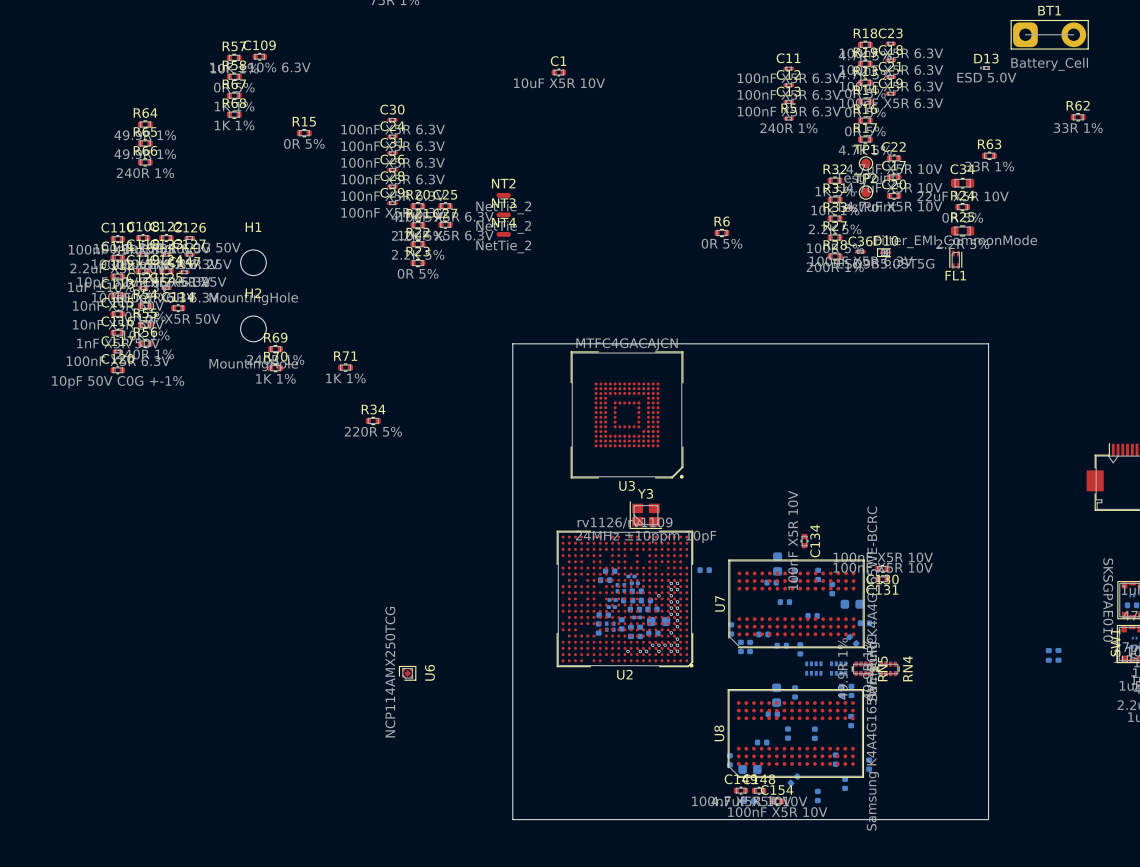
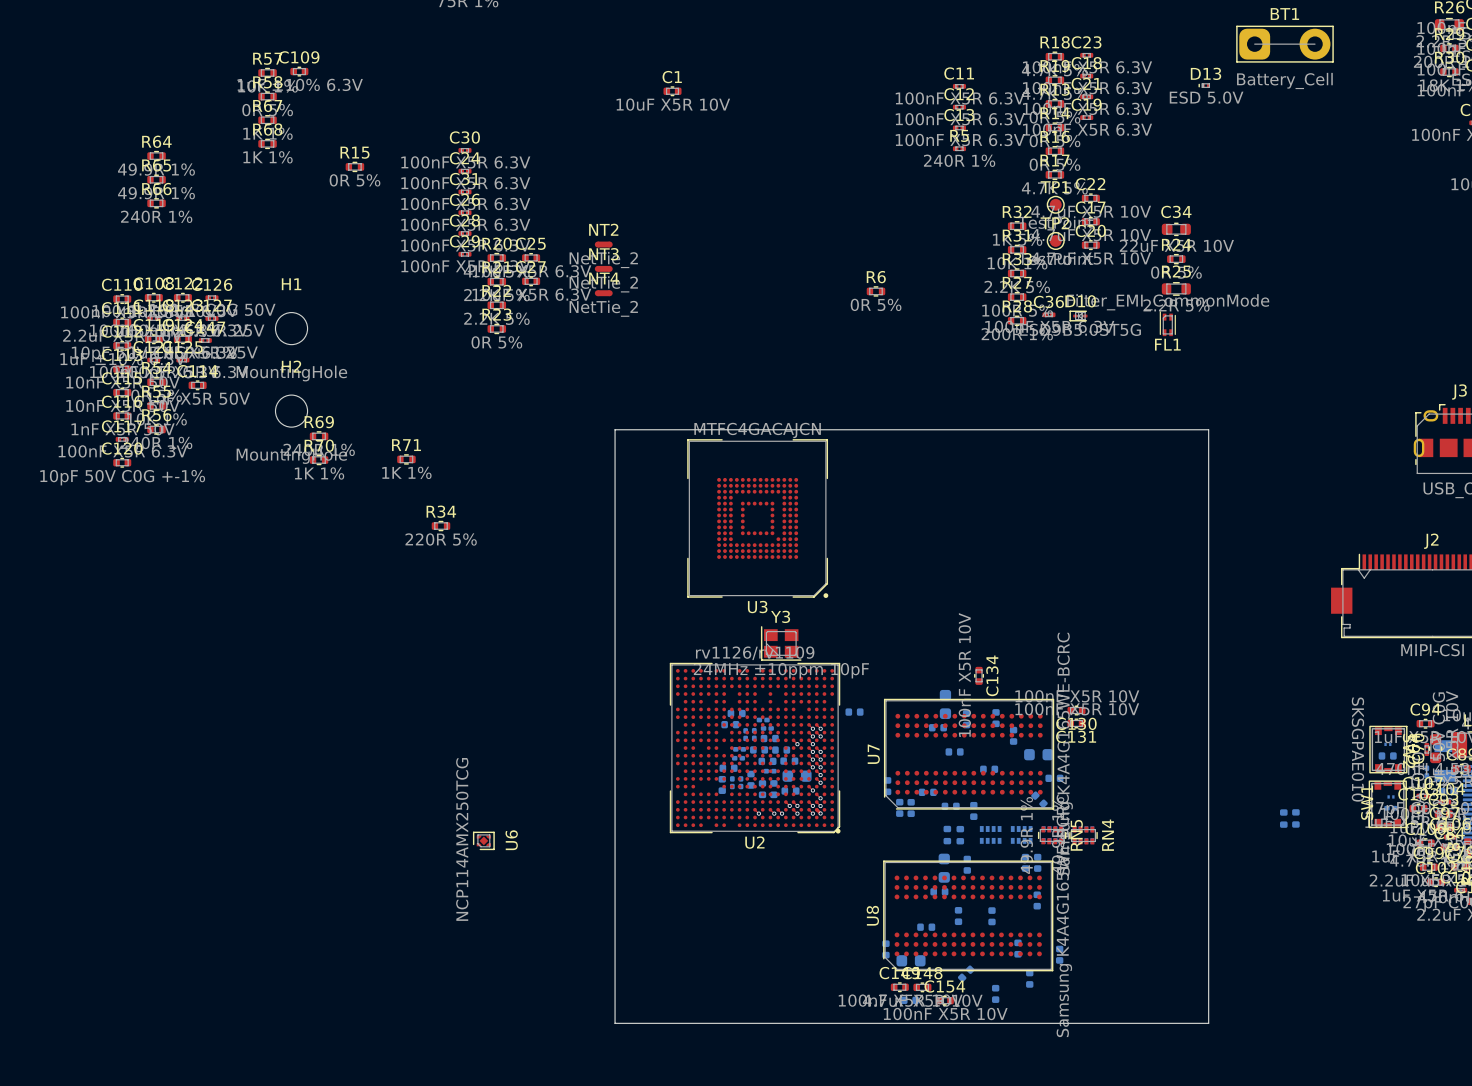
R62: 33R 1% (1078, 117) -> none
R63: 33R 1% (989, 155) -> none
top track: (662, 642) (665, 645) -> none
via: (665, 645) -> none
part: none -> (947, 835)
part: none -> (960, 835)

